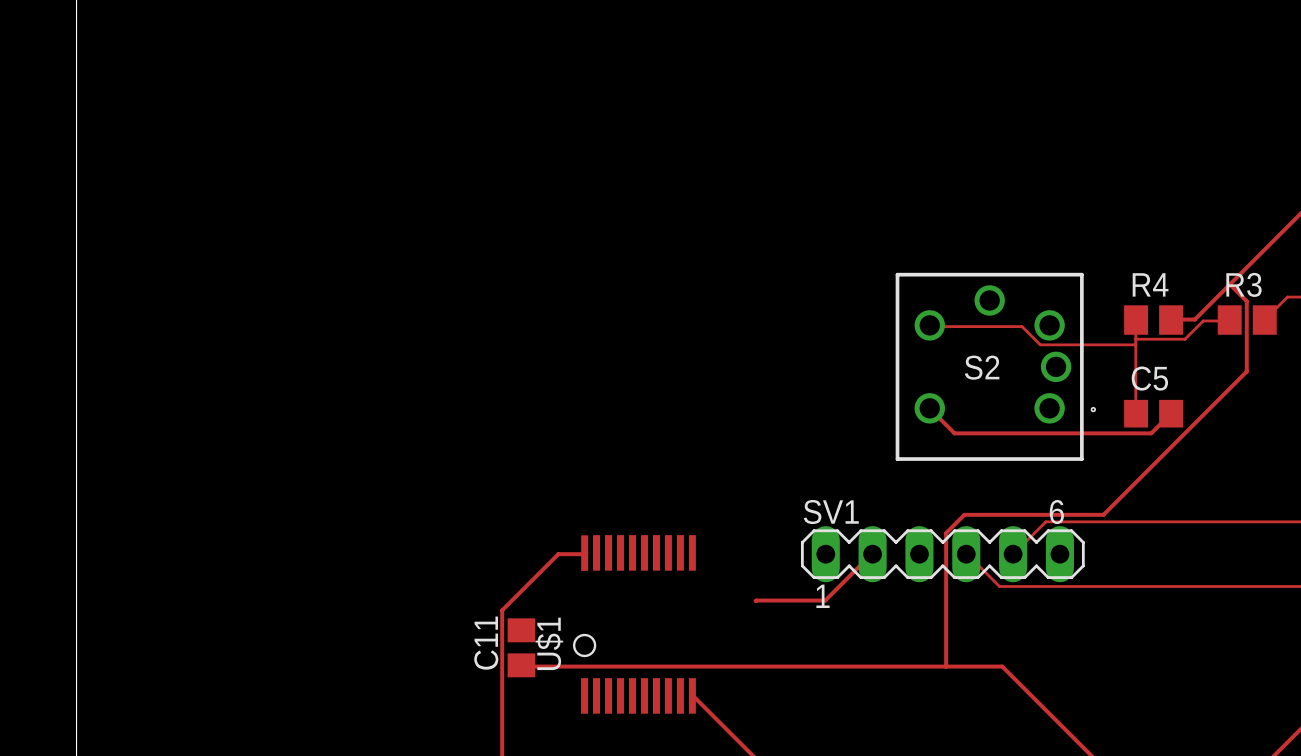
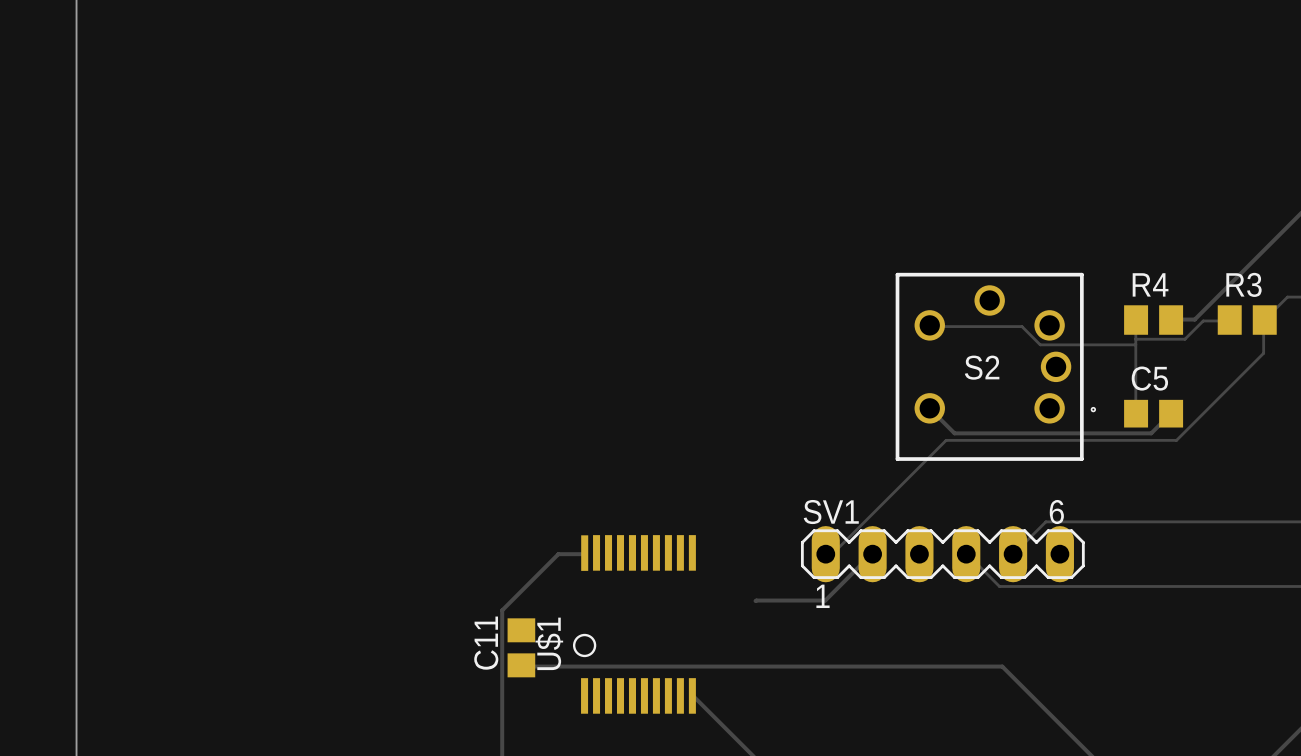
track: (1229, 284) (1246, 301) (1246, 371) (1103, 514) (964, 514) (946, 533) (946, 666) -> none
track: none -> (1264, 320) (1263, 353) (1176, 440) (946, 440) (832, 554) (825, 554)

